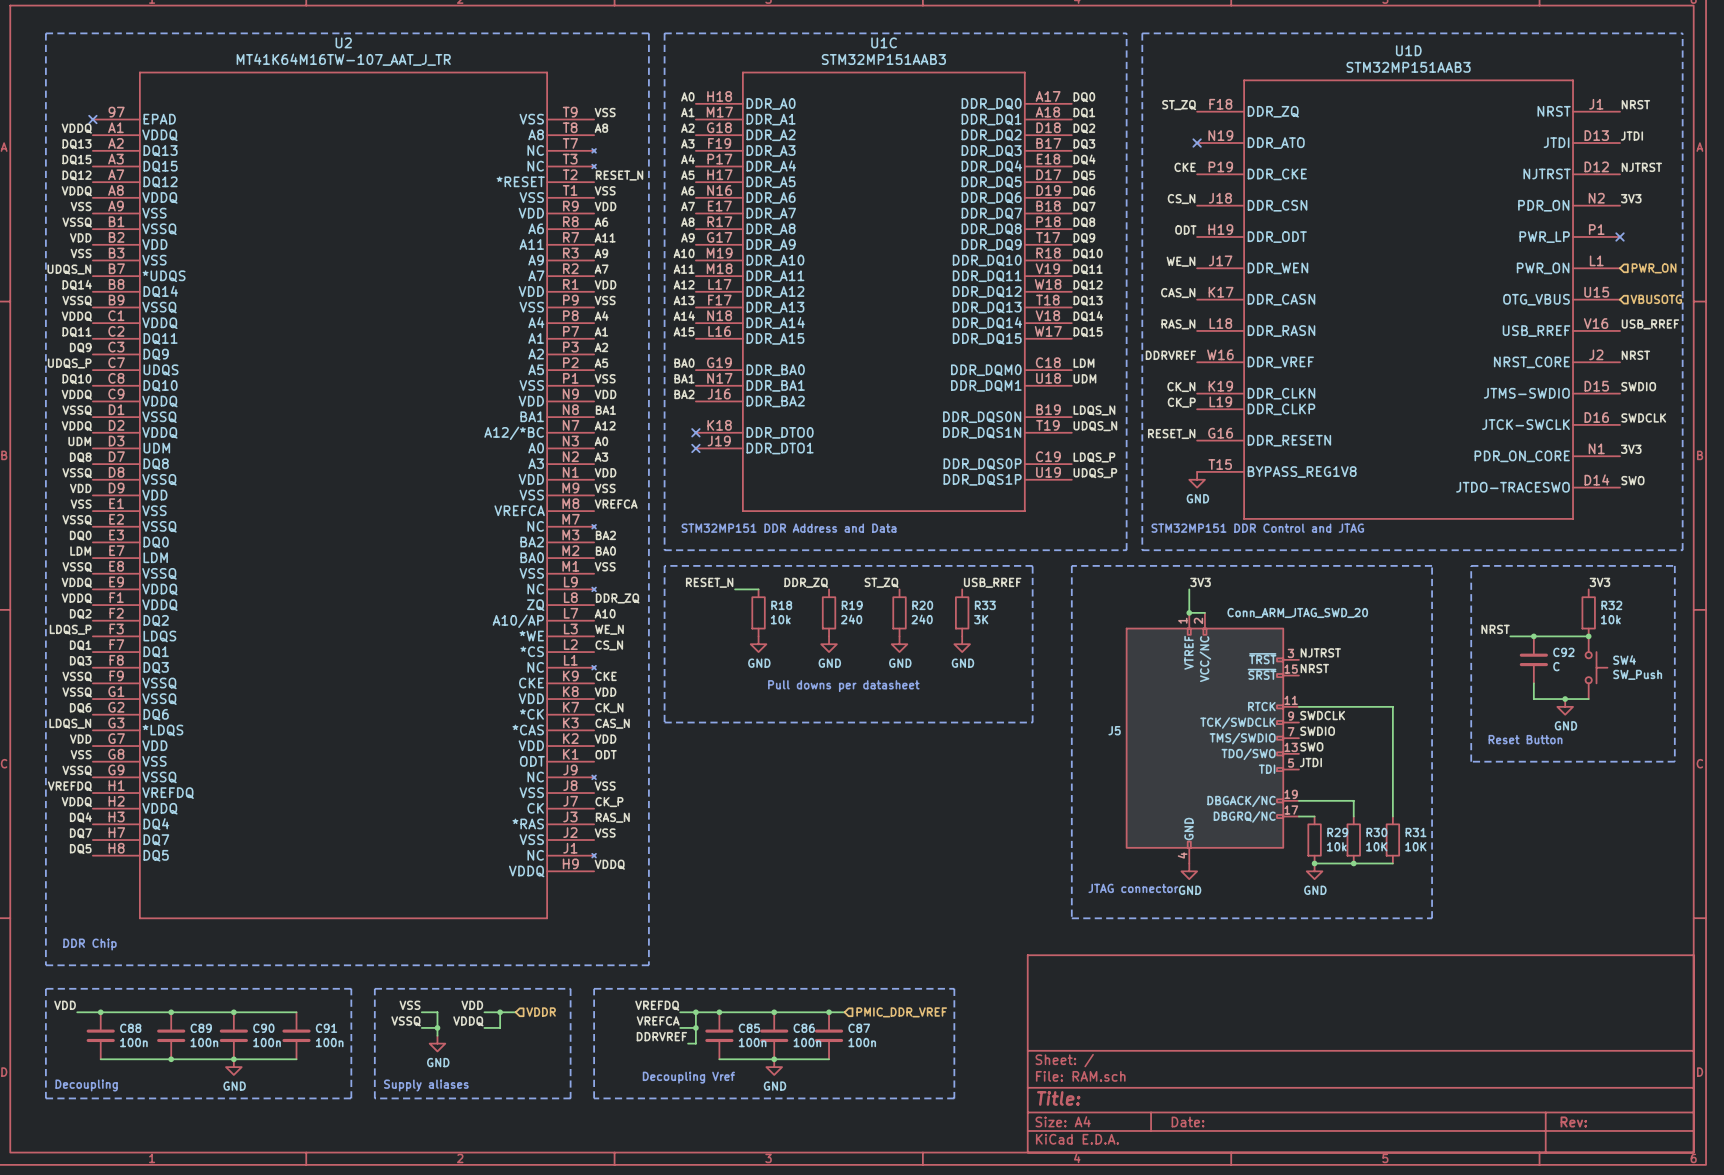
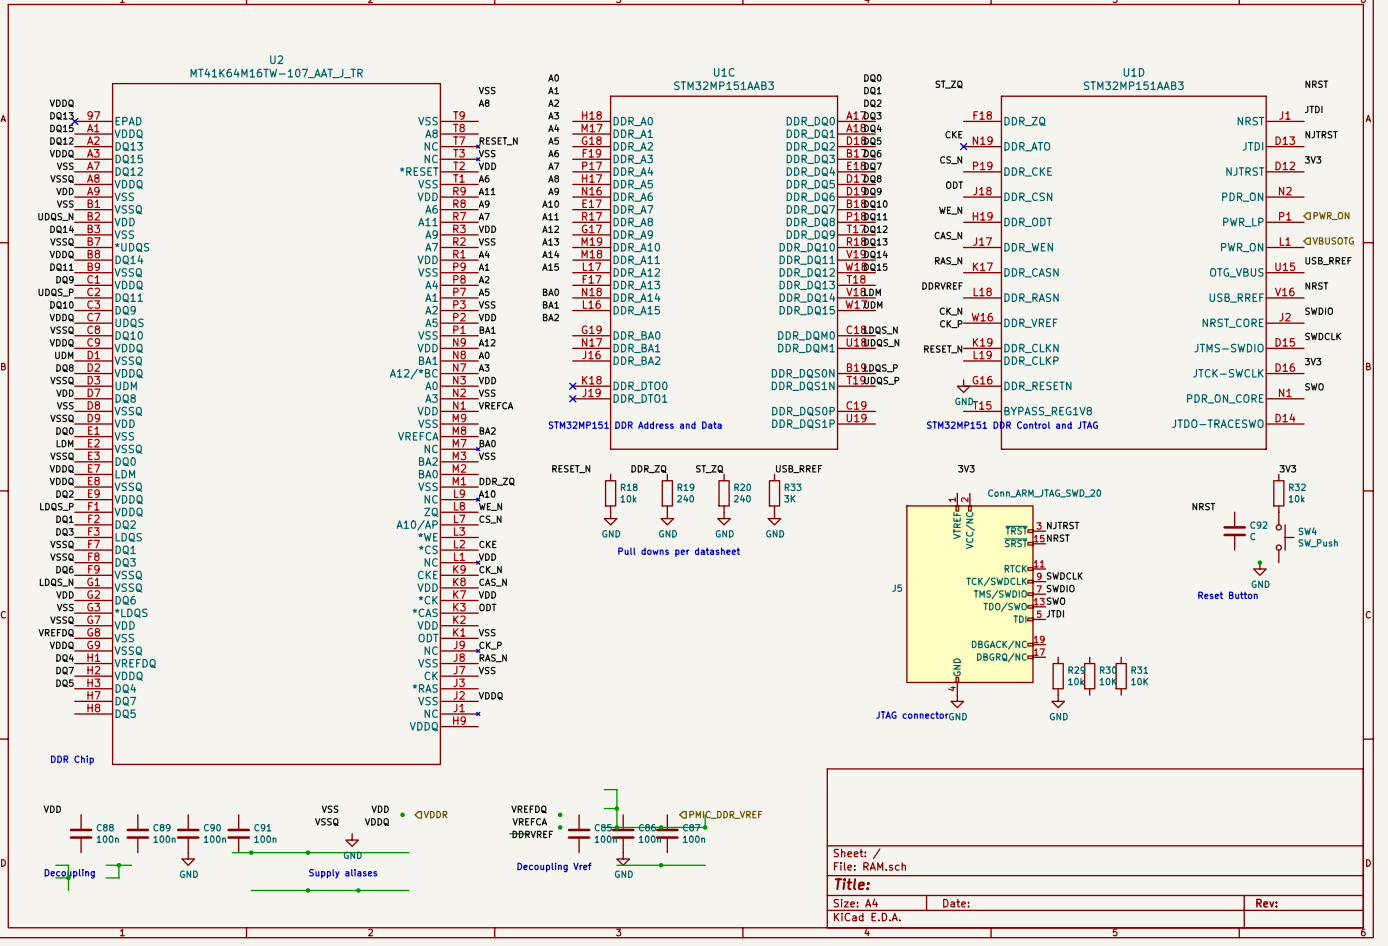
line: (45, 33) (45, 965) (648, 965) (648, 33) (45, 33) -> none
line: (664, 33) (1126, 33) (1126, 550) (664, 550) (664, 33) -> none
line: (1142, 33) (1682, 33) (1682, 550) (1142, 550) (1142, 33) -> none
no-connect mark position: (92, 119) -> (74, 121)
no-connect mark: (1197, 143) -> none
no-connect mark: none -> (963, 146)
no-connect mark: (1620, 236) -> none
U1C position: (883, 291) -> (724, 272)
U1D position: (1408, 299) -> (1133, 272)
no-connect mark: (695, 432) -> none
no-connect mark: (695, 448) -> none
no-connect mark: none -> (572, 386)
U2 position: (344, 495) -> (277, 424)
no-connect mark: none -> (572, 398)
line: (664, 565) (1032, 565) (1032, 722) (664, 722) (664, 565) -> none
line: (1071, 565) (1432, 565) (1432, 918) (1071, 918) (1071, 565) -> none
line: (1471, 565) (1471, 761) (1674, 761) (1674, 565) (1471, 565) -> none
wire: (735, 589) (758, 589) -> none
wire: (1189, 589) (1189, 612) (1204, 612) -> none
junction: (1189, 612) -> none
wire: (1510, 636) (1588, 636) -> none
junction: (1533, 636) -> none
junction: (1588, 636) -> none
wire: (1533, 683) (1533, 699) (1588, 699) -> none
wire: (1298, 706) (1392, 706) (1392, 816) -> none
wire: (1298, 800) (1353, 800) (1353, 816) -> none
wire: (1298, 816) (1314, 816) -> none
wire: (1314, 863) (1392, 863) -> none
junction: (1314, 863) -> none
junction: (1353, 863) -> none
wire: none -> (604, 789) (616, 789) (616, 827)
line: (45, 988) (351, 988) (351, 1098) (45, 1098) (45, 988) -> none
line: (374, 988) (570, 988) (570, 1098) (374, 1098) (374, 988) -> none
line: (594, 988) (954, 988) (954, 1098) (594, 1098) (594, 988) -> none
junction: none -> (616, 808)
wire: (77, 1012) (296, 1012) -> none
junction: (100, 1012) -> none
junction: (171, 1012) -> none
junction: (233, 1012) -> none
wire: (421, 1012) (437, 1012) (437, 1035) -> none
wire: (484, 1012) (515, 1012) -> none
wire: (500, 1012) (500, 1027) (484, 1027) -> none
wire: (680, 1012) (844, 1012) -> none
wire: (695, 1012) (695, 1043) (688, 1043) -> none
junction: (719, 1012) -> none
junction: (774, 1012) -> none
junction position: (829, 1012) -> (661, 827)
wire: none -> (705, 814) (705, 827) (604, 827)
wire: (421, 1027) (437, 1027) -> none
junction: (437, 1027) -> none
wire: (680, 1027) (695, 1027) -> (604, 808) (616, 808)
junction: none -> (616, 827)
junction: none -> (705, 827)
wire: none -> (509, 833) (528, 833)
wire: (100, 1059) (288, 1059) -> none
junction position: (171, 1059) -> (118, 865)
junction: (233, 1059) -> none
wire: none -> (238, 852) (408, 852)
junction: none -> (251, 852)
junction: none -> (308, 852)
wire: (719, 1059) (829, 1059) -> (616, 865) (705, 865)
junction: (774, 1059) -> none
wire: none -> (55, 865) (68, 865) (68, 890)
wire: none -> (106, 865) (131, 865)
wire: none -> (118, 865) (118, 877) (106, 877)
junction: none -> (661, 865)
wire: none -> (55, 877) (68, 877)
junction: none -> (68, 877)
wire: none -> (251, 890) (408, 890)
junction: none -> (308, 890)
junction: none -> (358, 890)

